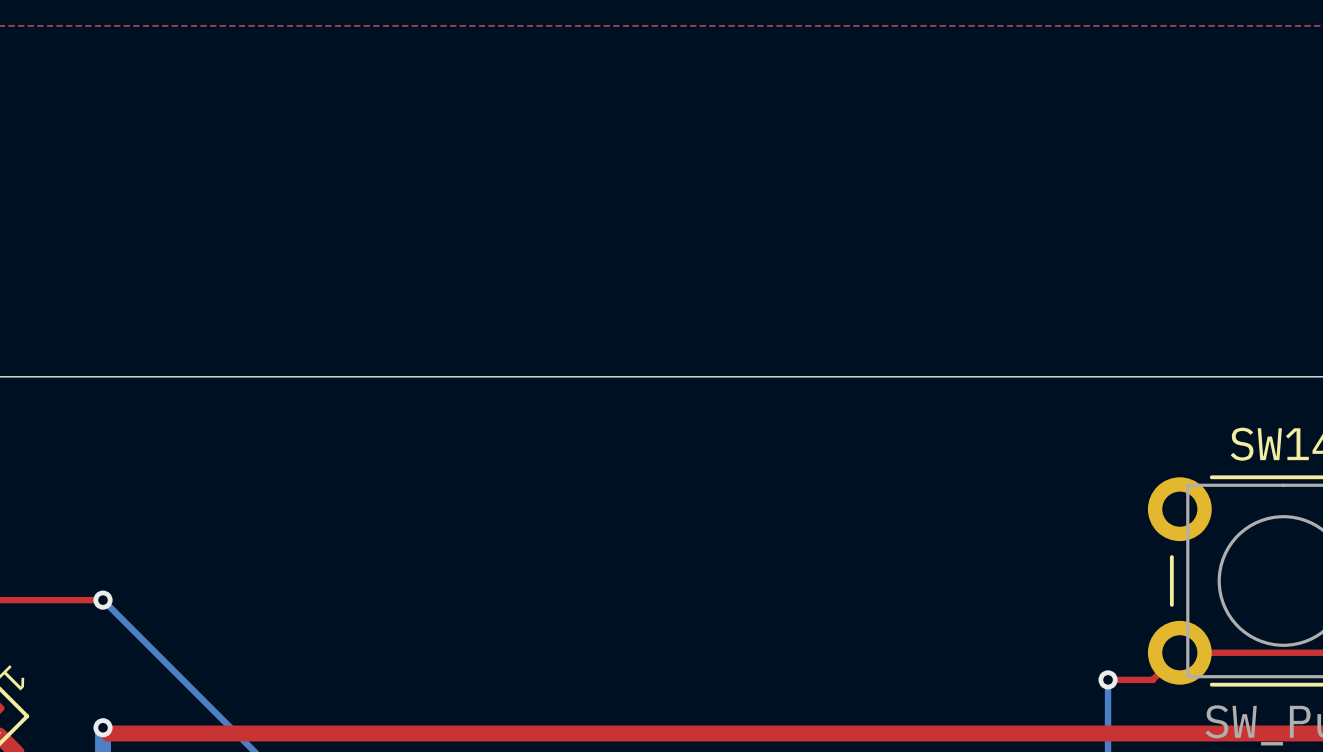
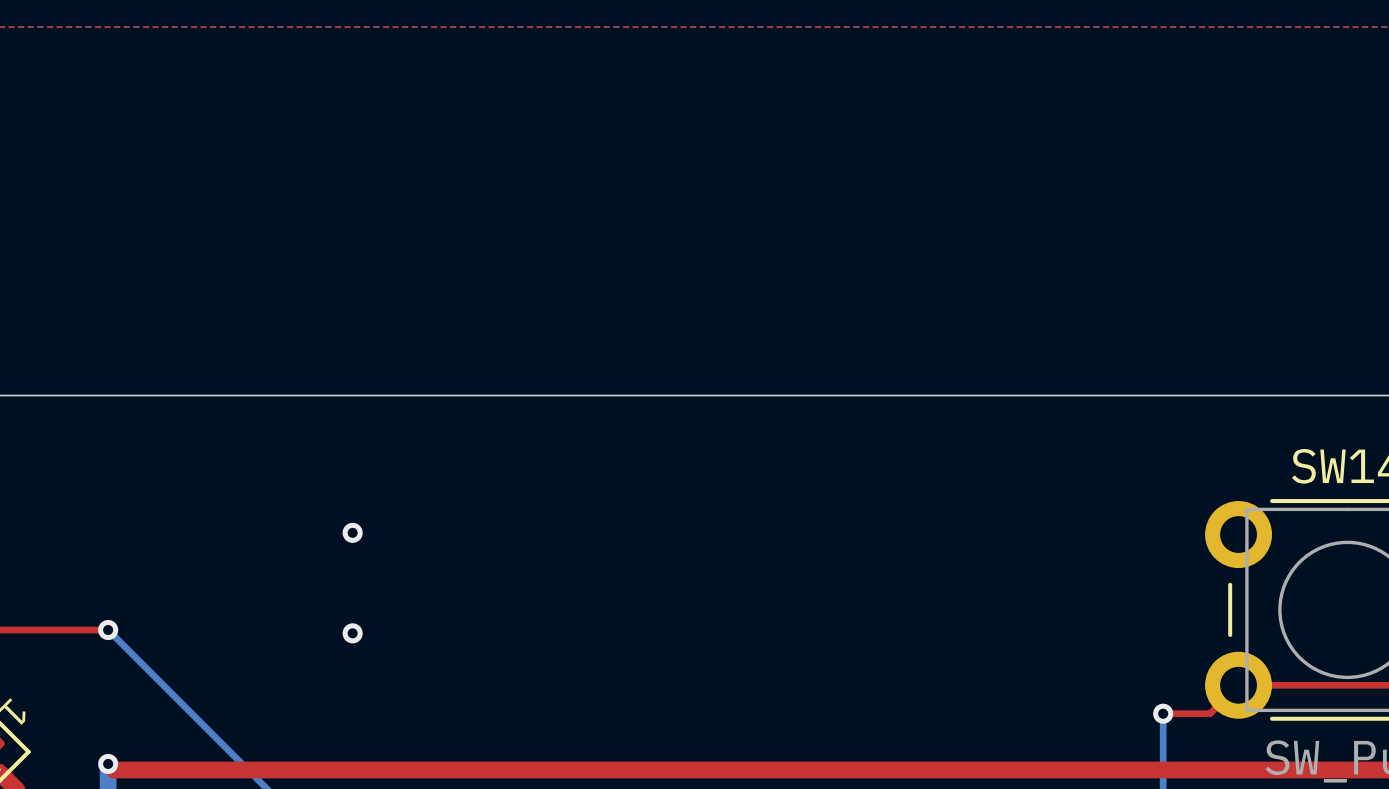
via: none -> (352, 532)
via: none -> (352, 633)

